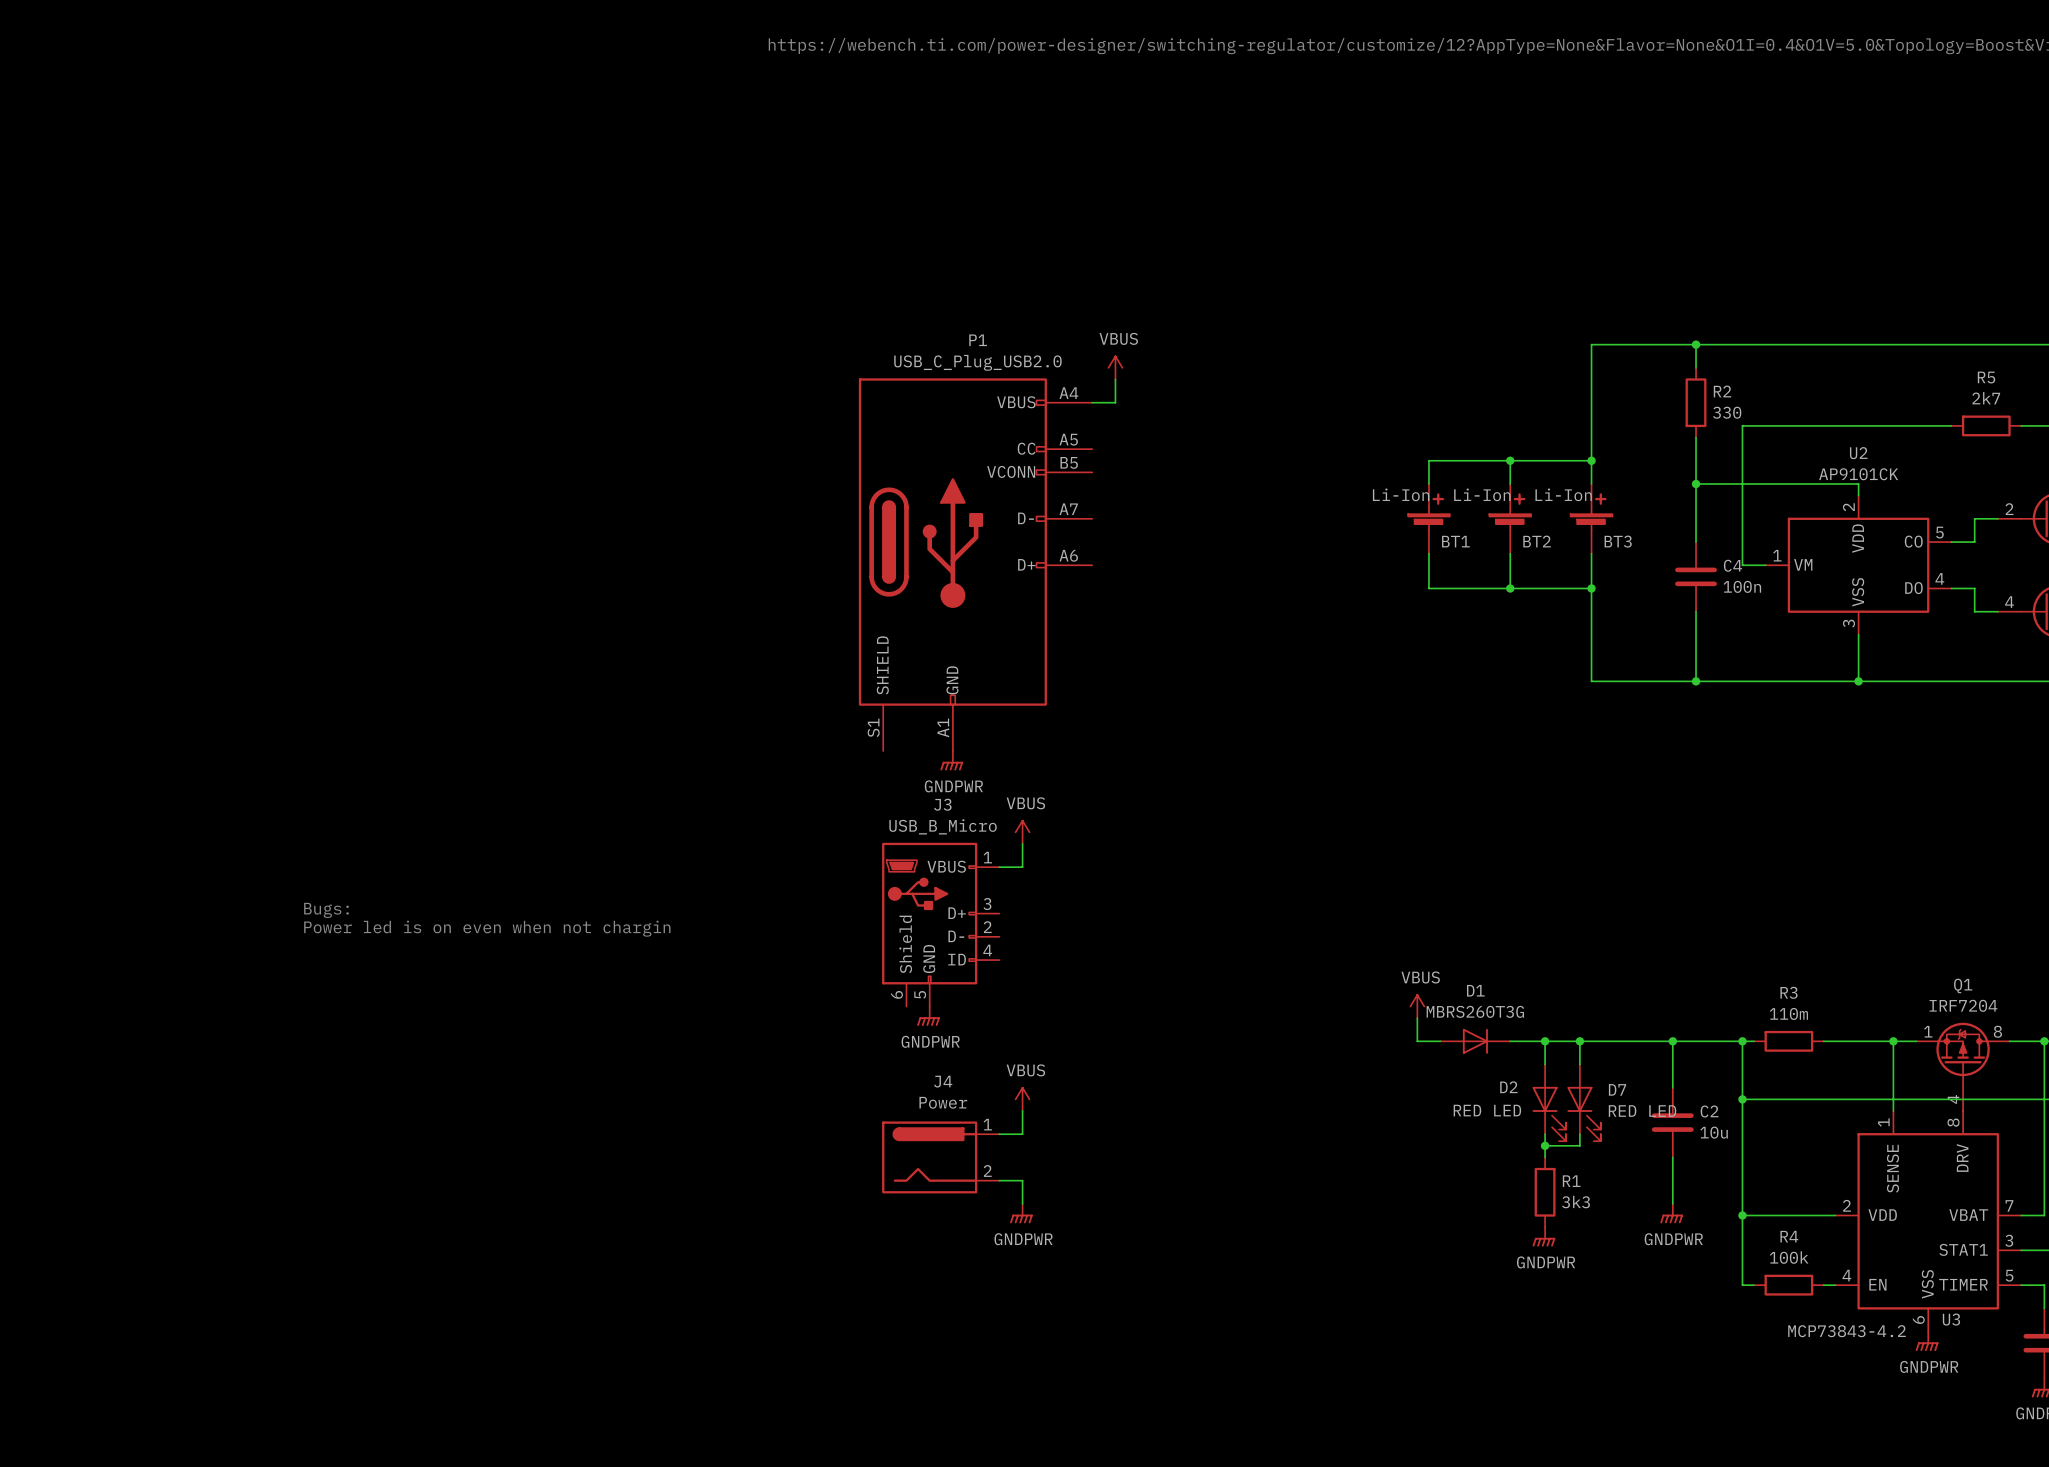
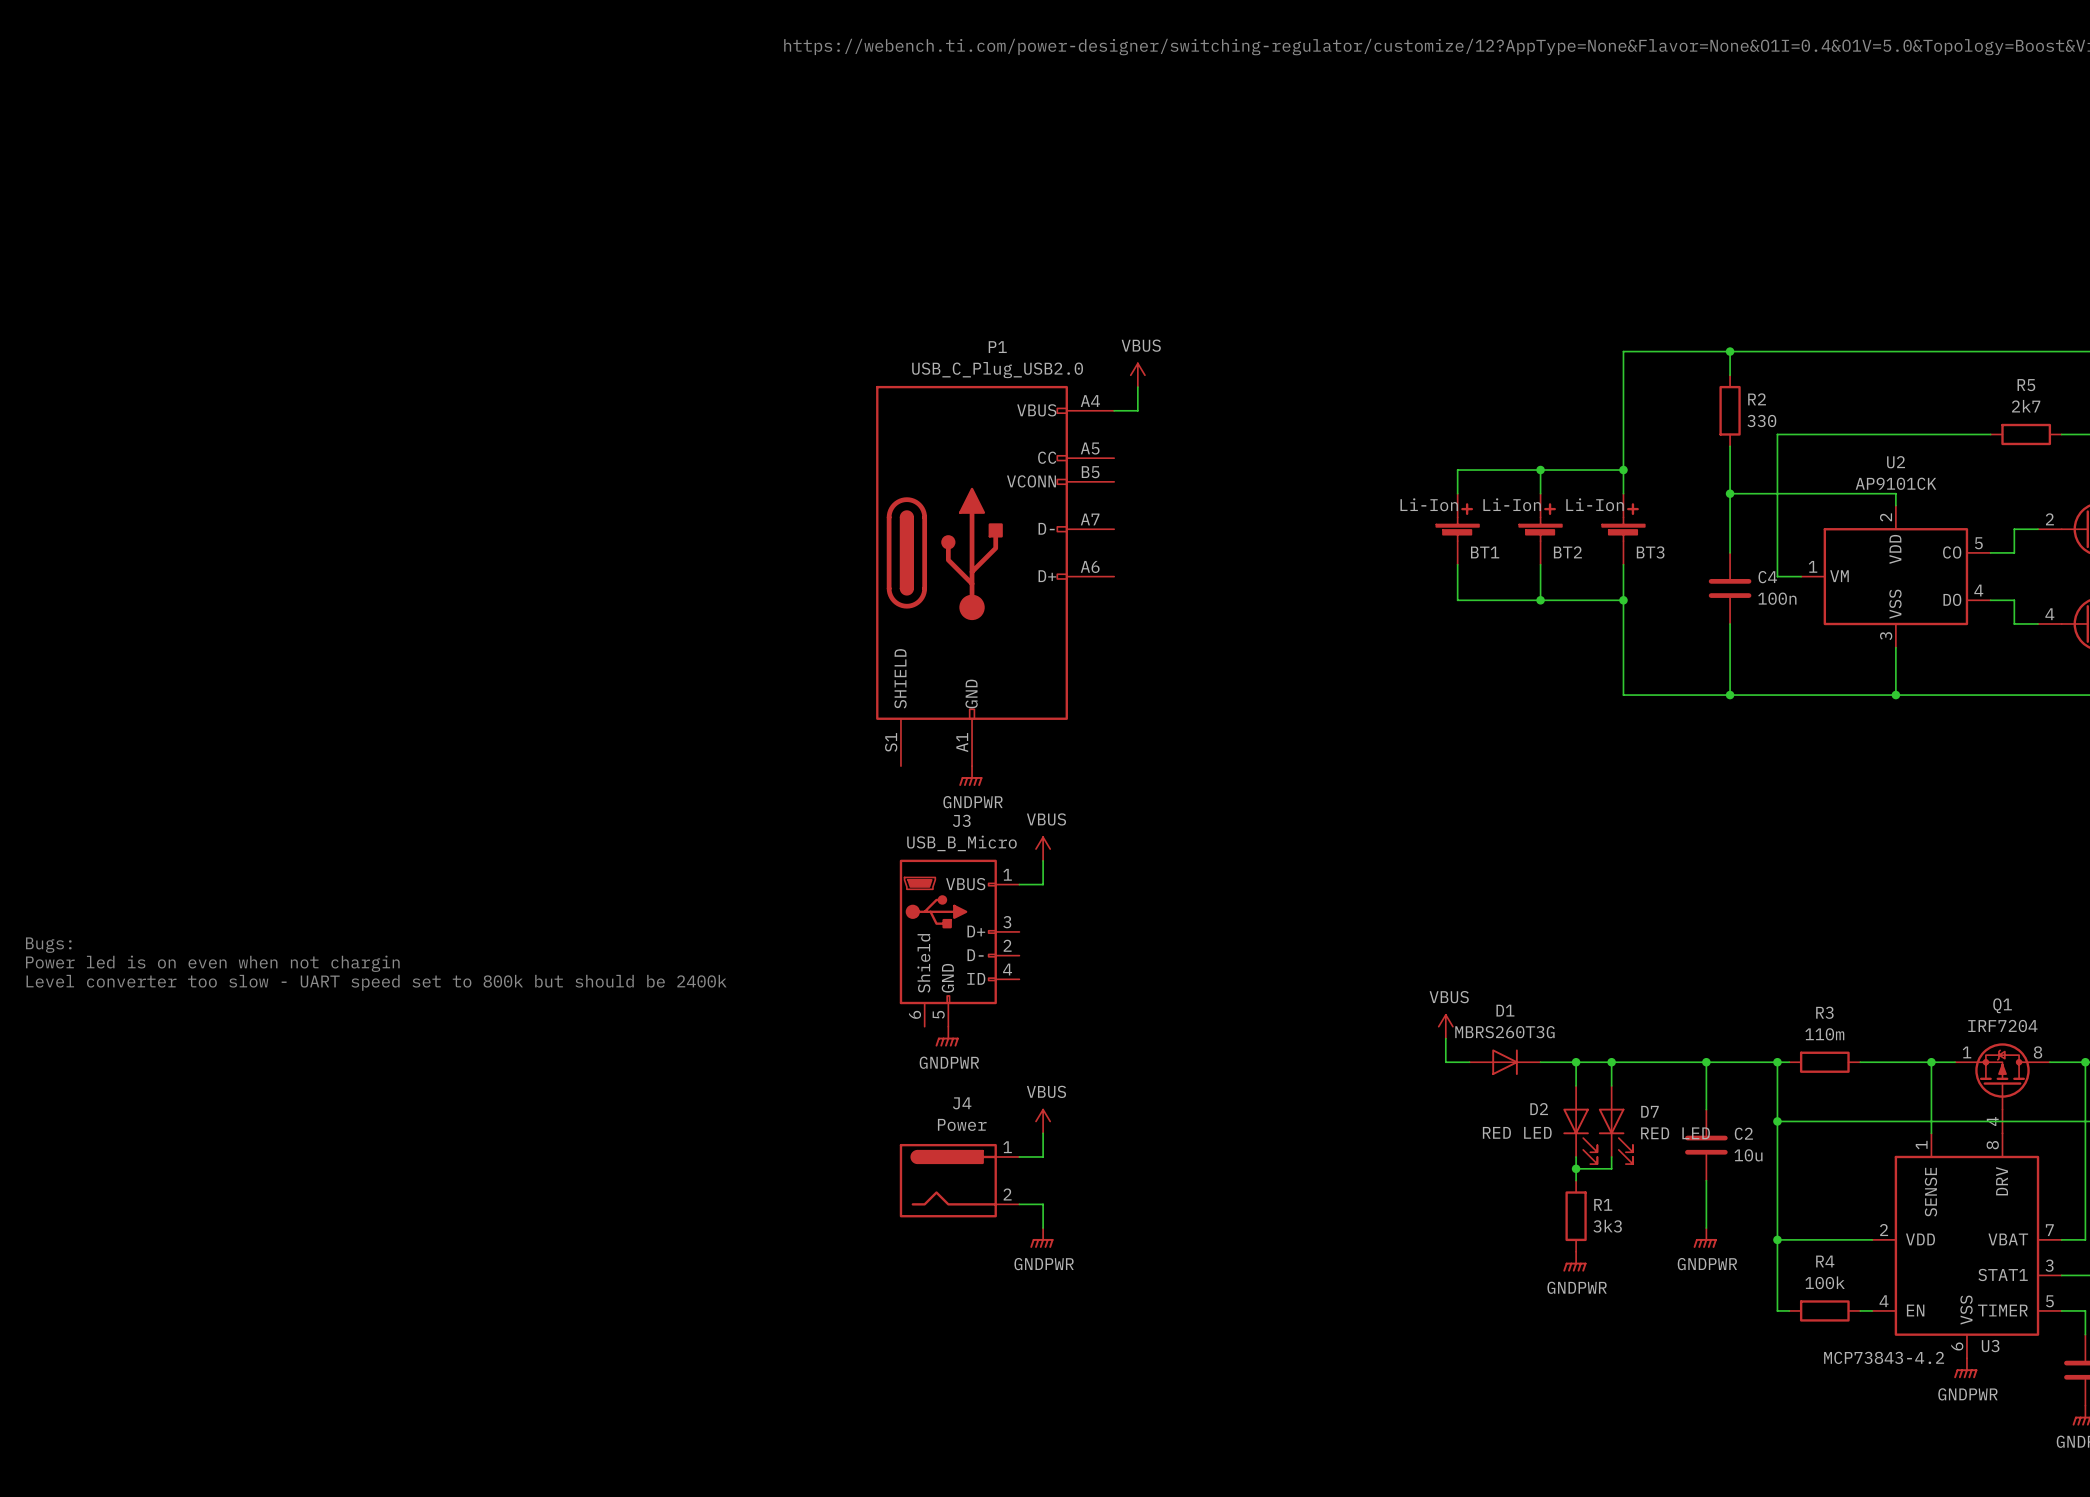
text: Bugs: (326, 910) -> none
text: none -> Bugs: (48, 945)
text: Power led is on even when not chargin (487, 928) -> none
text: none -> Power led is on even when not chargin (212, 963)
text: none -> Level converter too slow - UART speed set to 800k but should be 2400k (376, 982)

